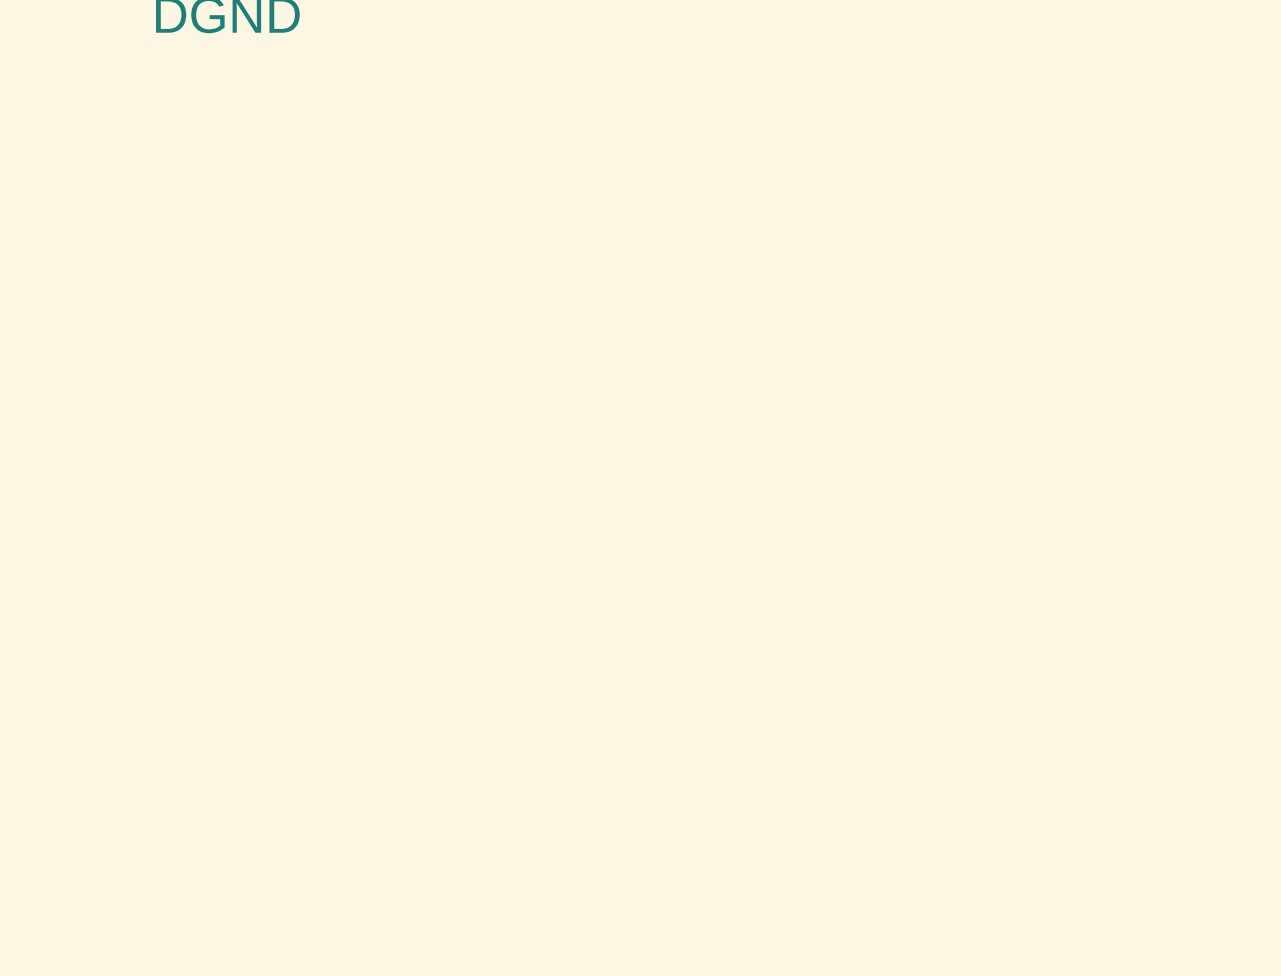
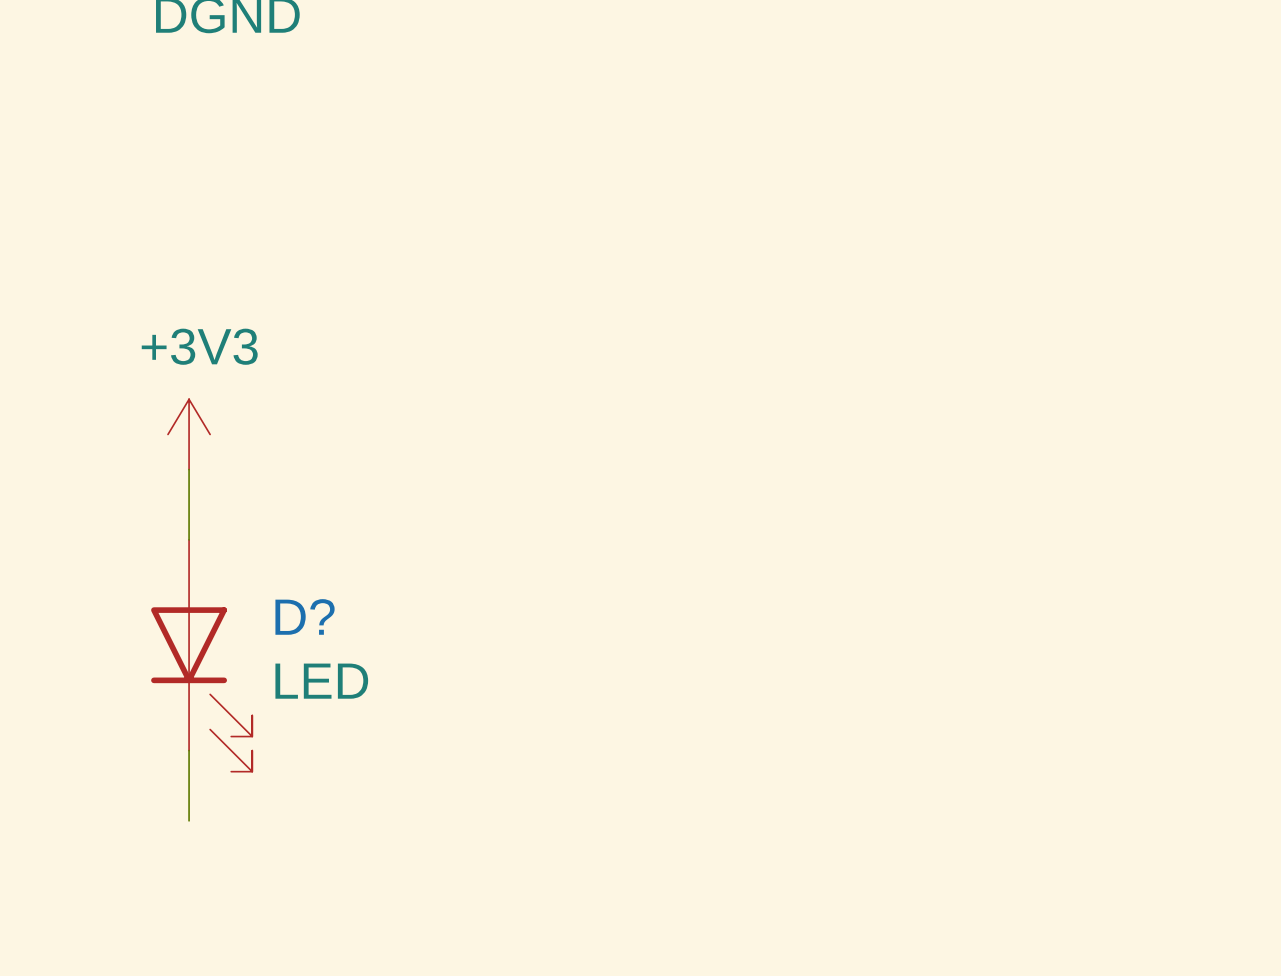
power symbol: none -> +3V3 (189, 434)
wire: none -> (189, 469) (189, 539)
D?: none -> LED (201, 655)
wire: none -> (189, 750) (189, 820)

